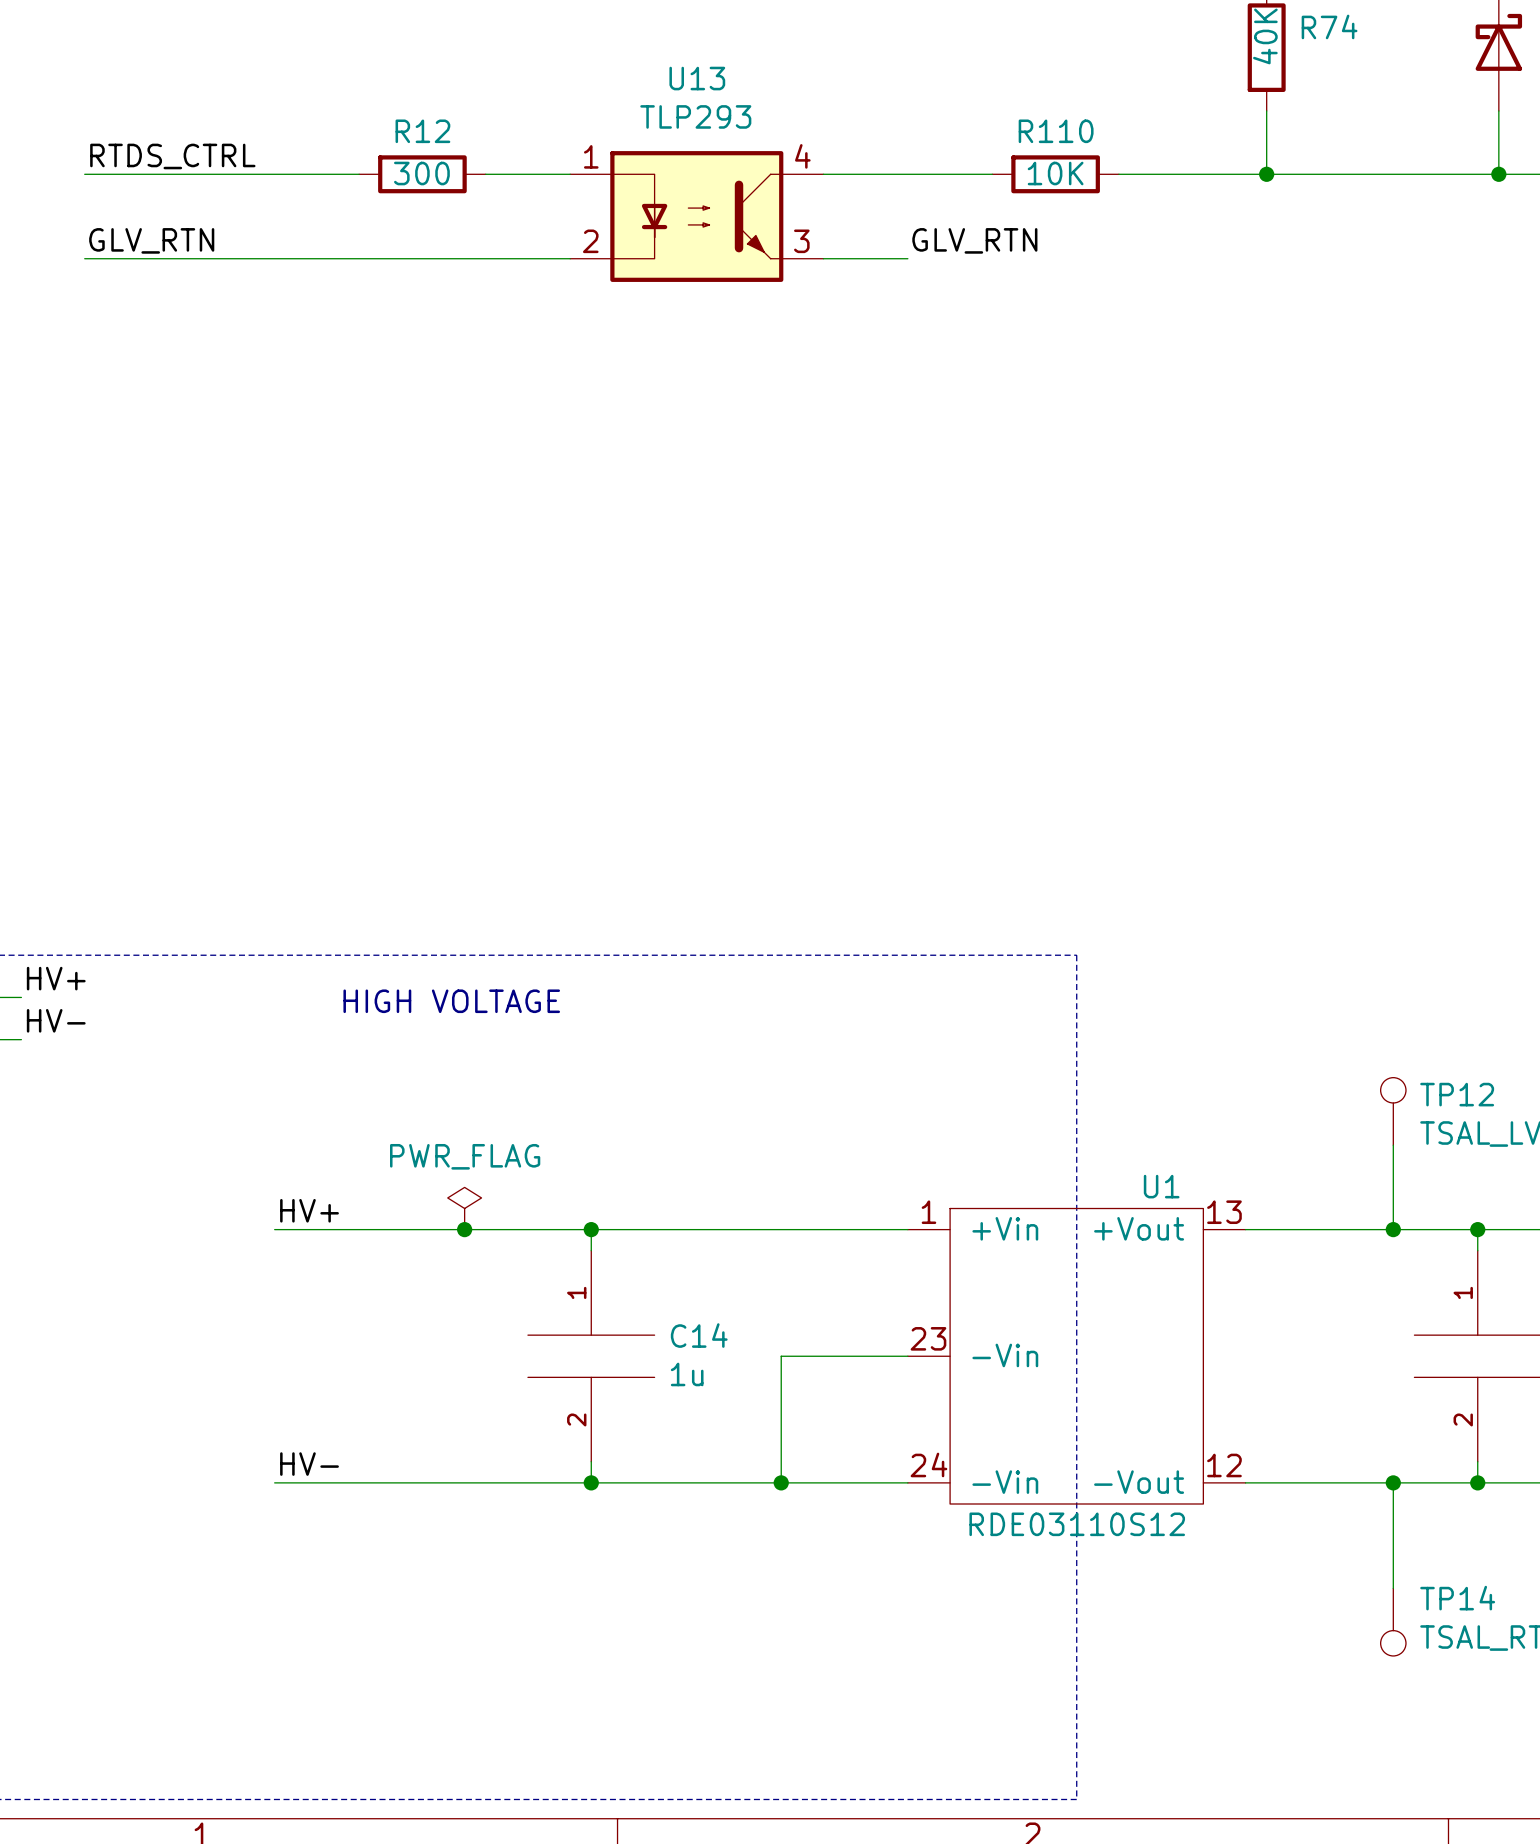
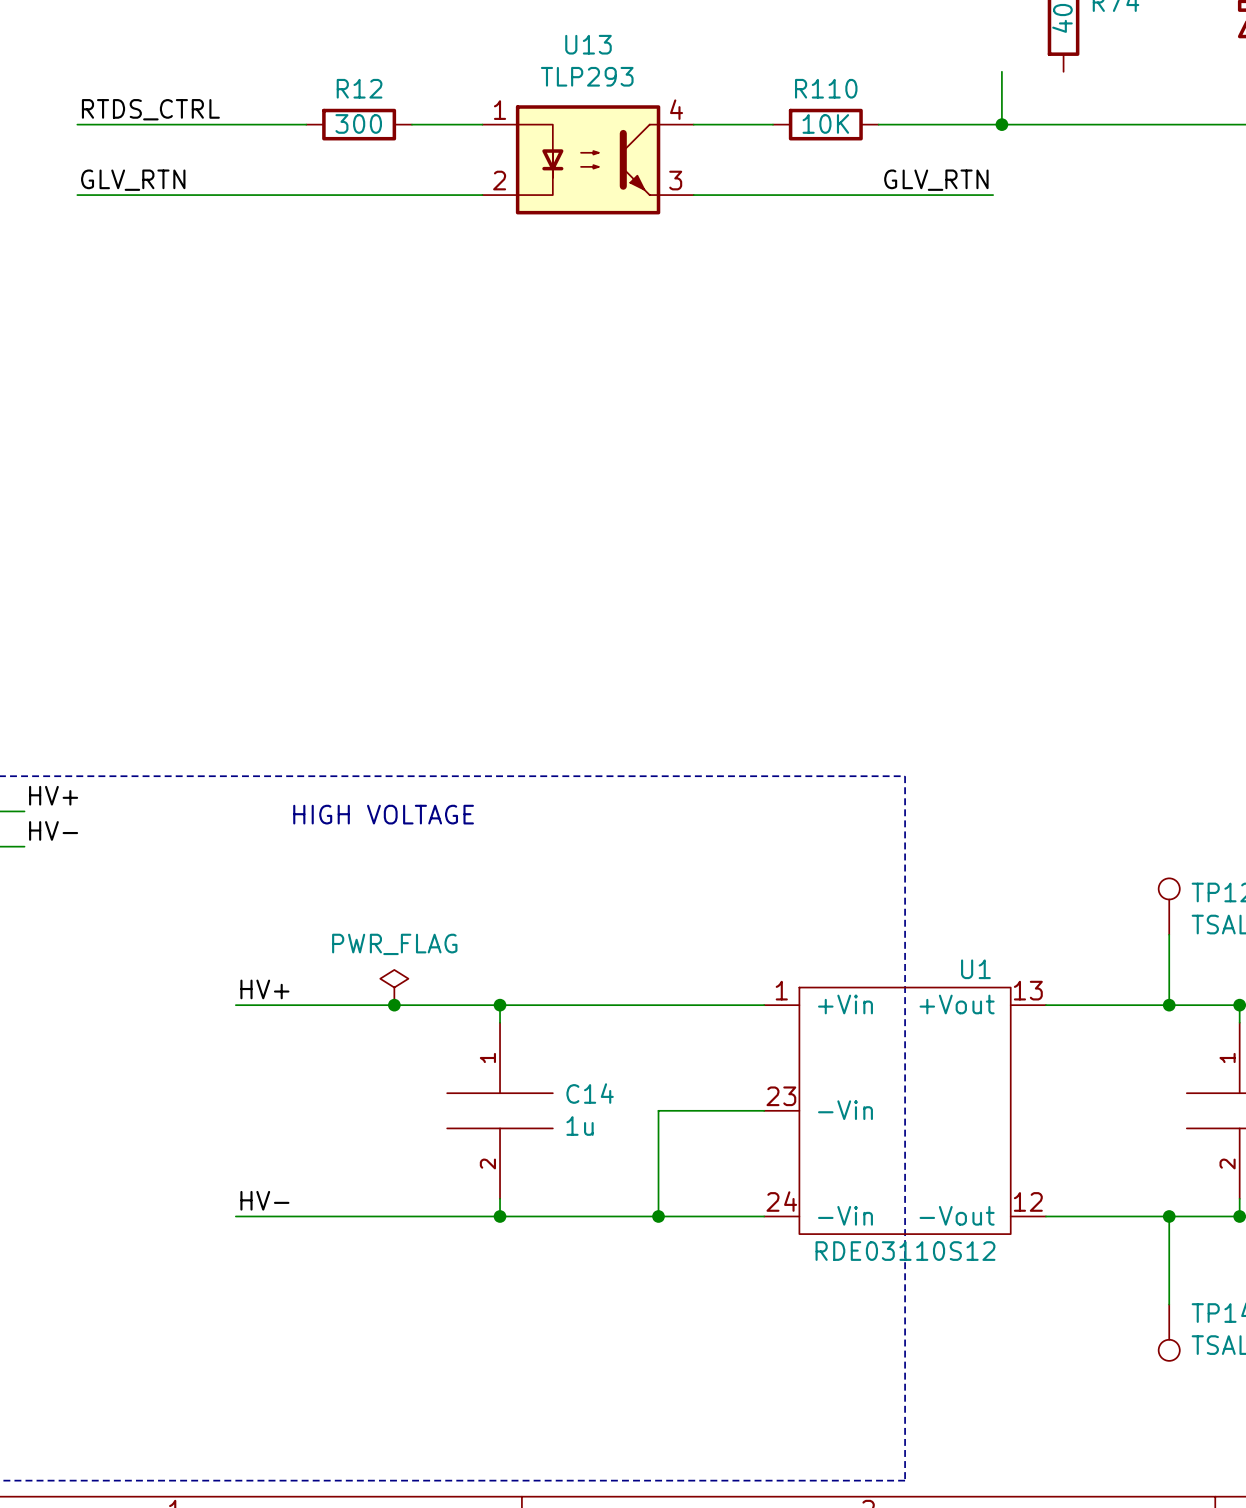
wire: (1266, 110) (1266, 174) -> (1001, 71) (1001, 124)
wire: (918, 174) (992, 174) -> (878, 124) (940, 124)
R110 position: (1055, 174) -> (825, 124)
junction position: (1266, 174) -> (1001, 124)
label position: GLV_RTN (974, 240) -> GLV_RTN (936, 180)
wire: none -> (764, 195) (993, 195)

